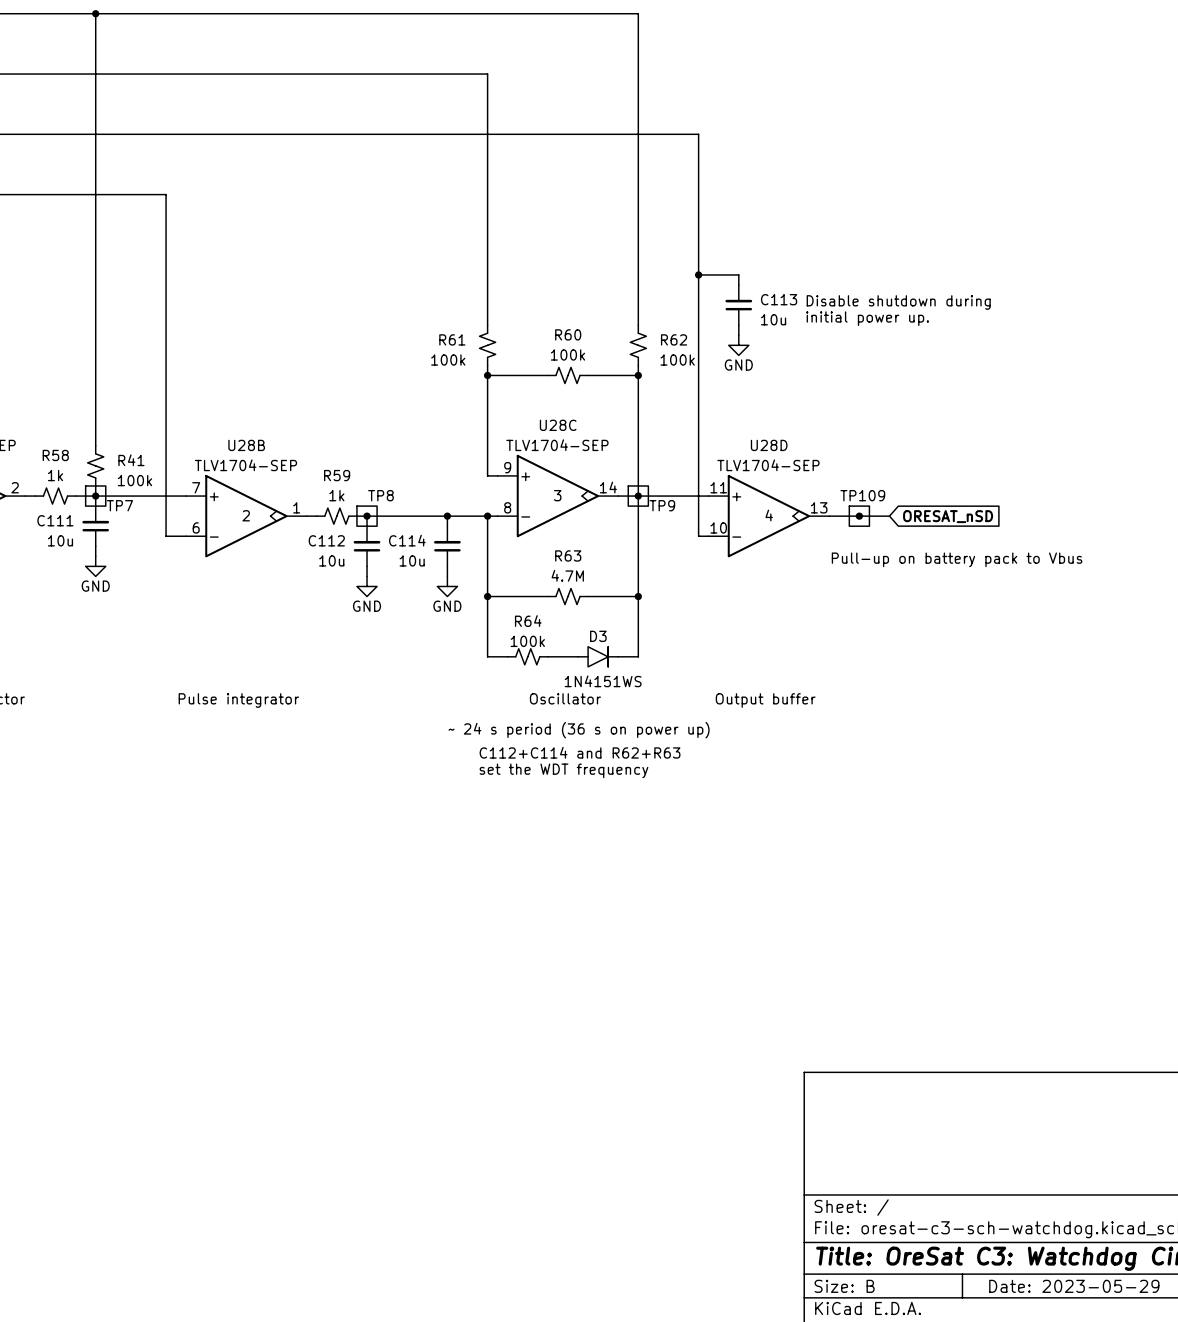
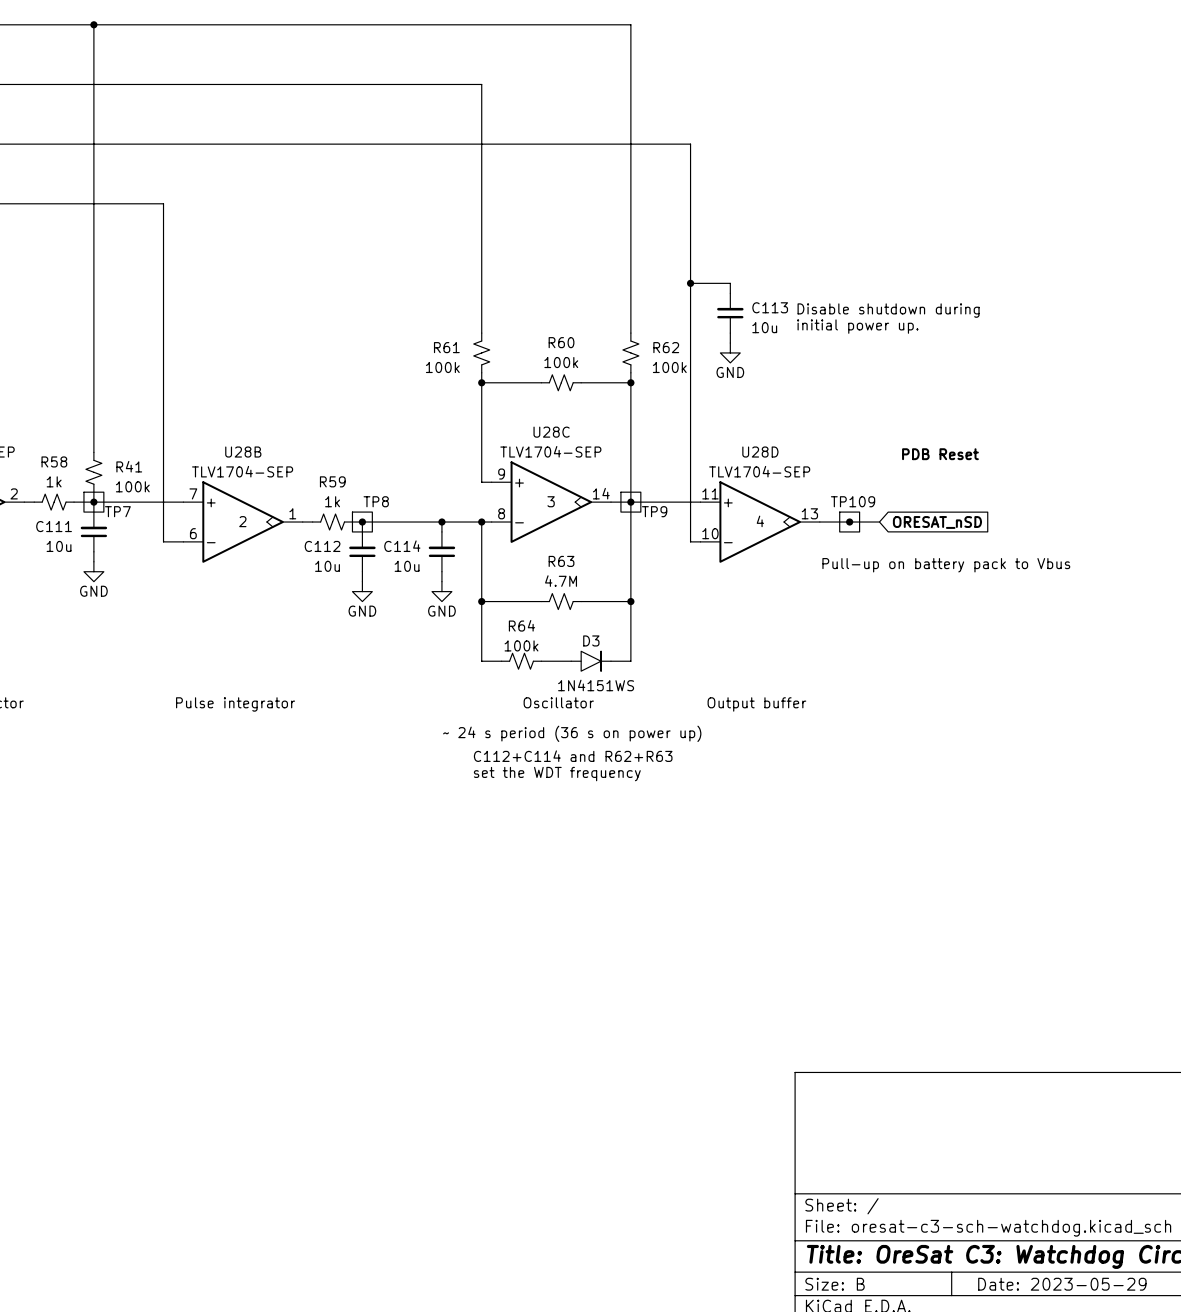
text: none -> PDB Reset (940, 454)

